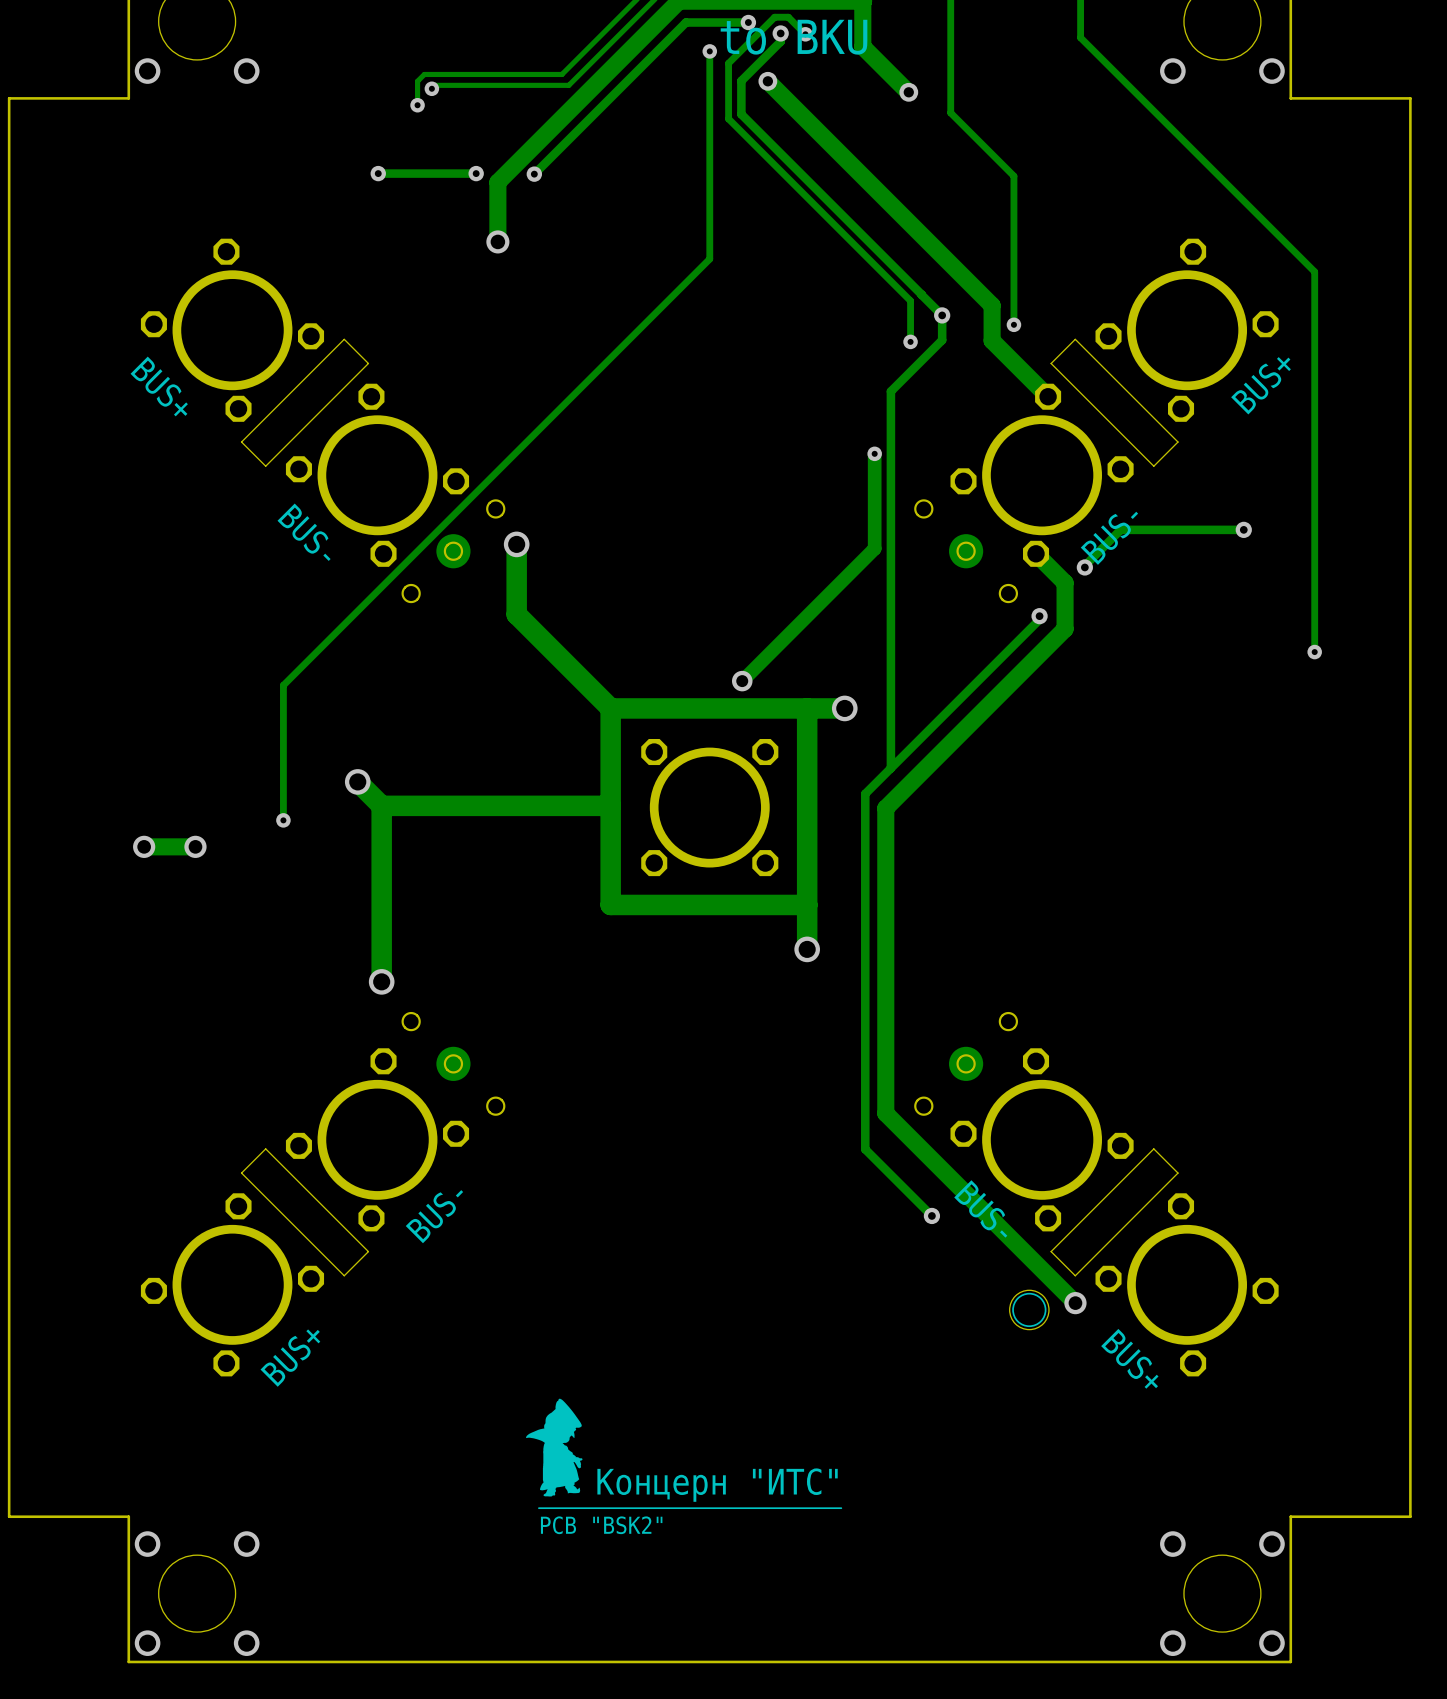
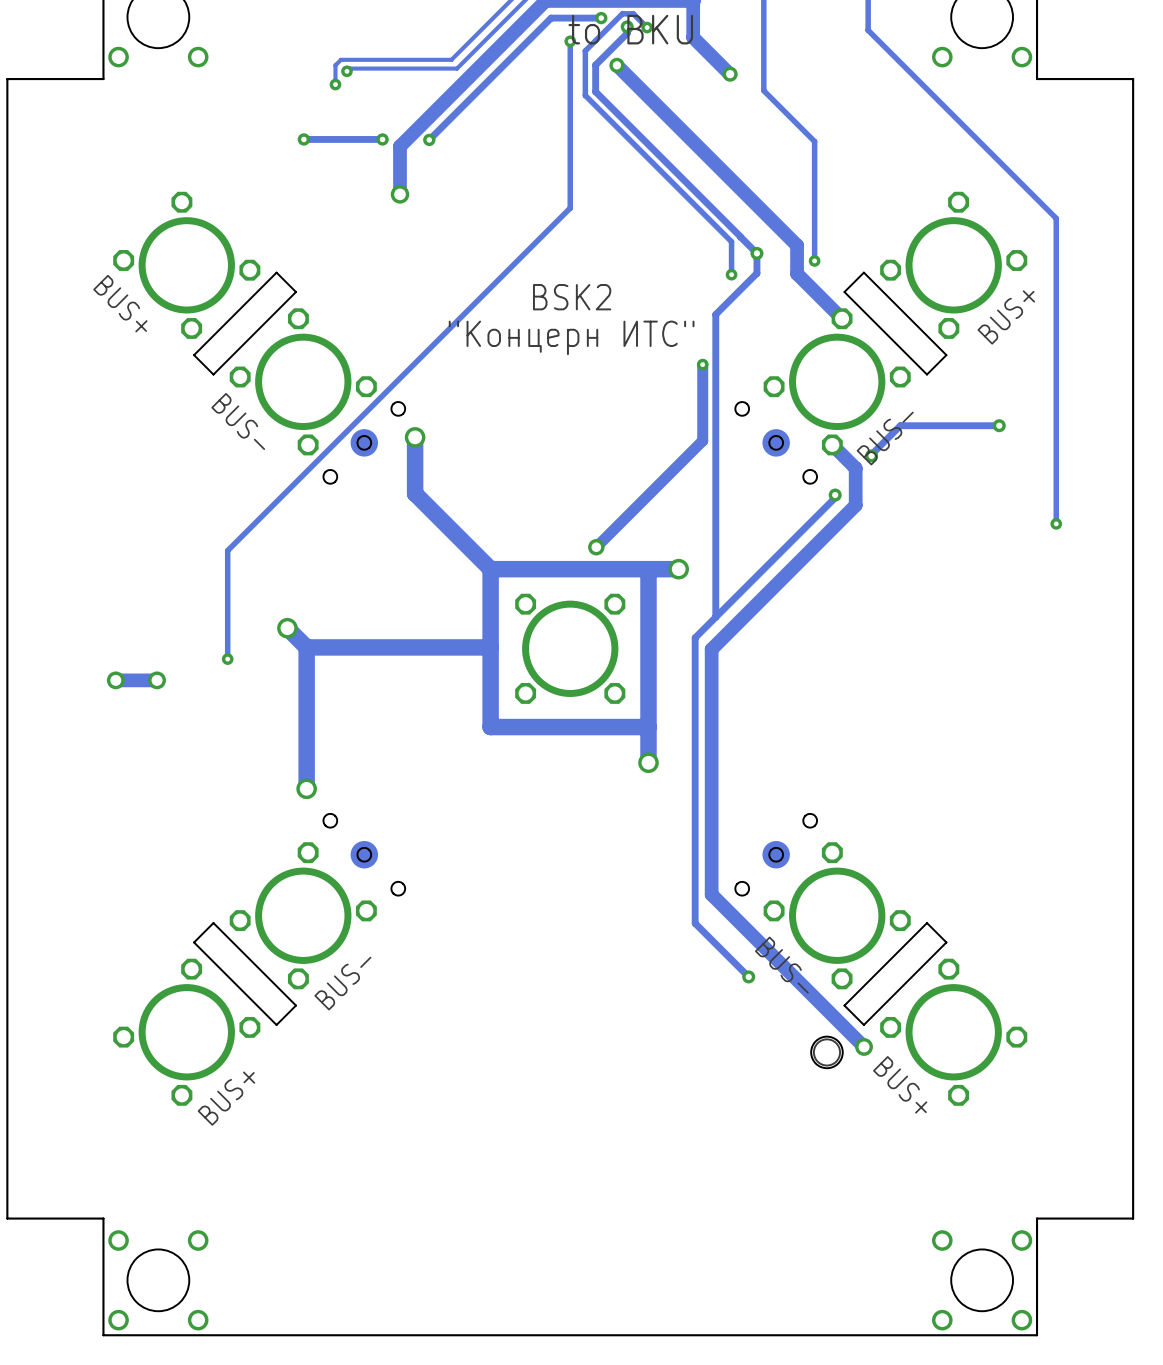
text: none -> BSK2 (572, 297)
text: none -> "Концерн ИТС" (571, 337)
drawing: [526, 1398, 843, 1510] -> none

